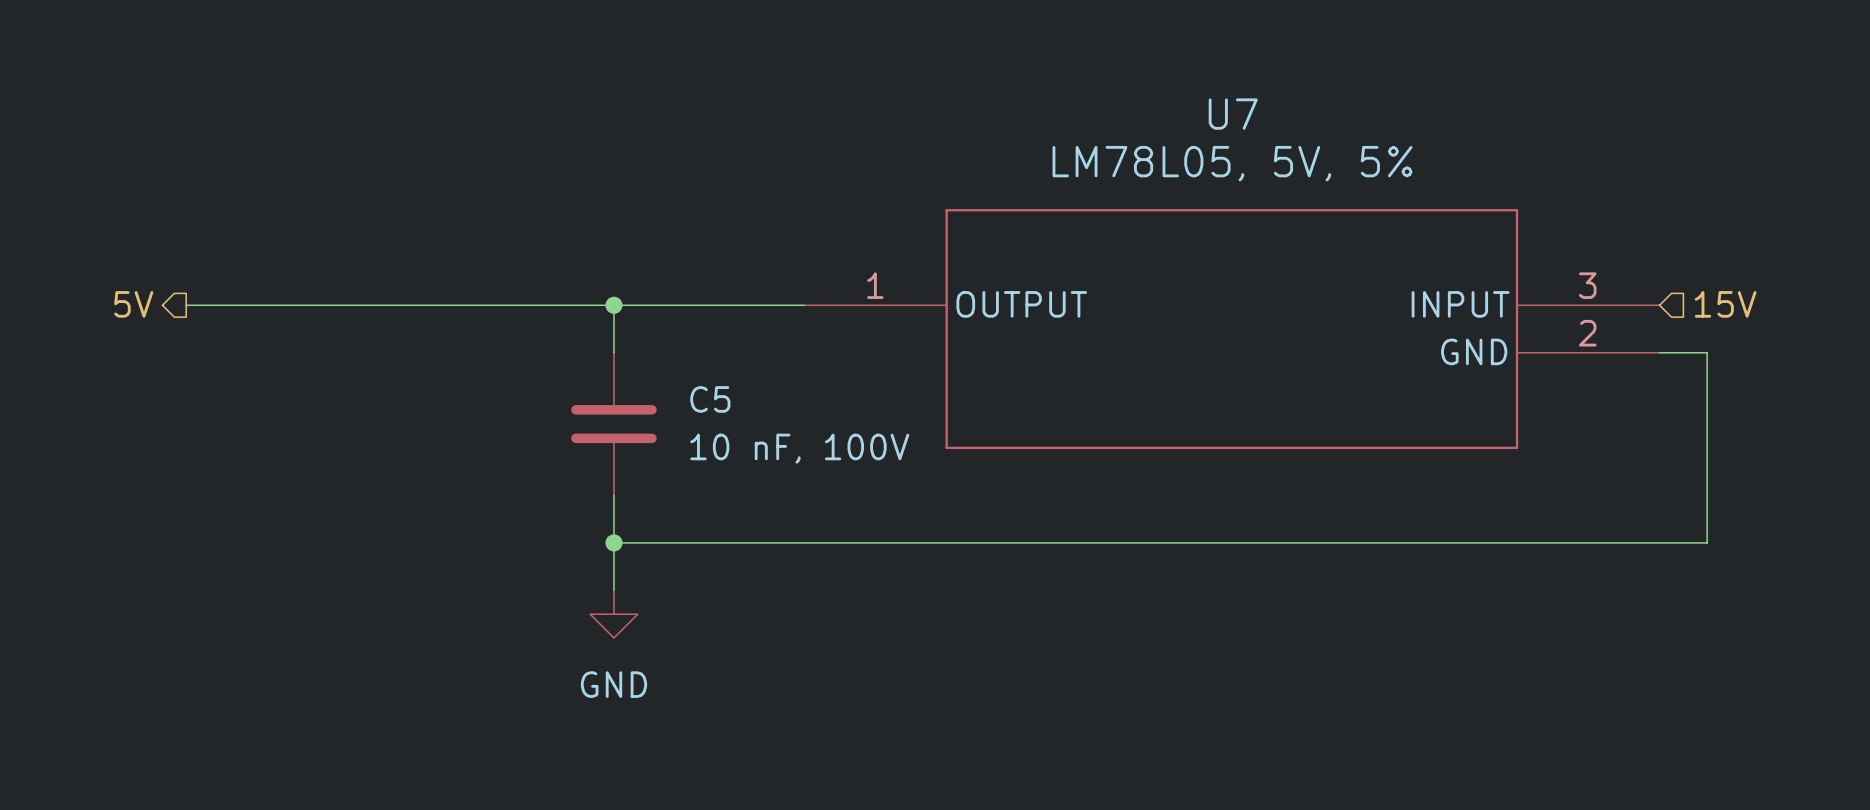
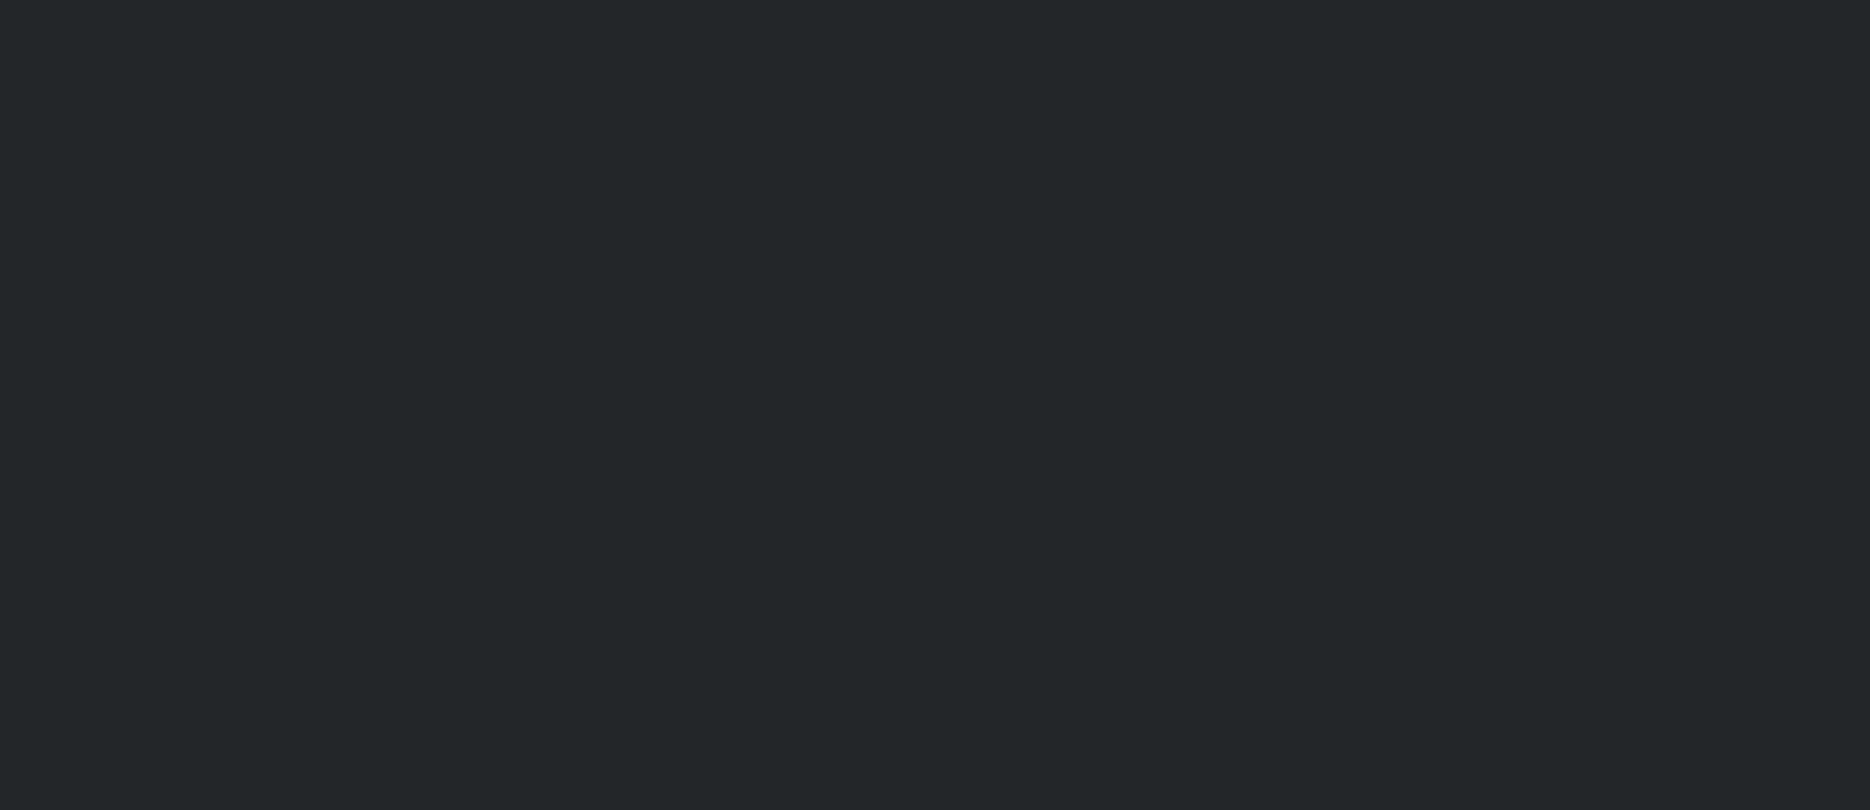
hierarchical label: 5V (133, 304) -> none
hierarchical label: 15V (1725, 304) -> none
wire: (186, 305) (804, 305) -> none
wire: (613, 305) (613, 352) -> none
junction: (613, 305) -> none
U7: LM78L05, 5V, 5% (1231, 329) -> none
wire: (1659, 352) (1707, 352) (1707, 542) (613, 542) -> none
C5: 10 nF, 100V (613, 424) -> none
wire: (613, 495) (613, 590) -> none
junction: (613, 542) -> none
power symbol: GND (613, 614) -> none

